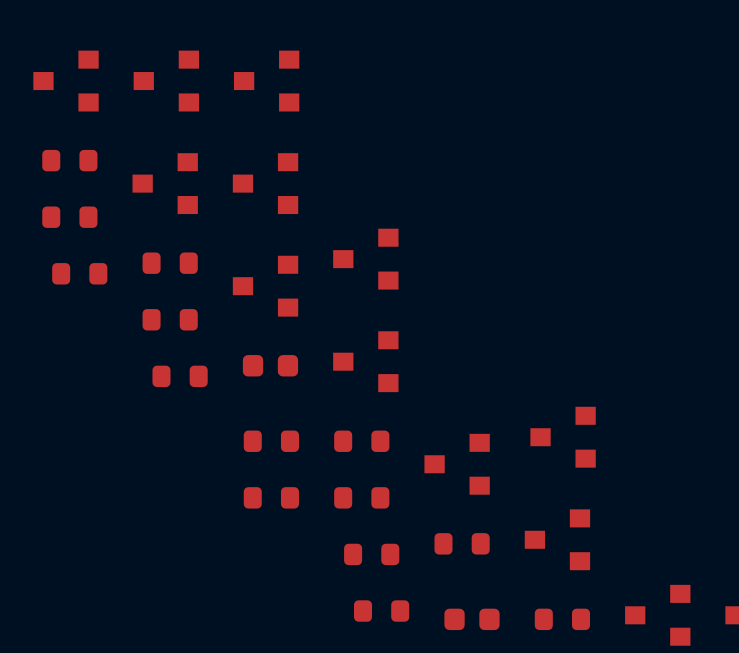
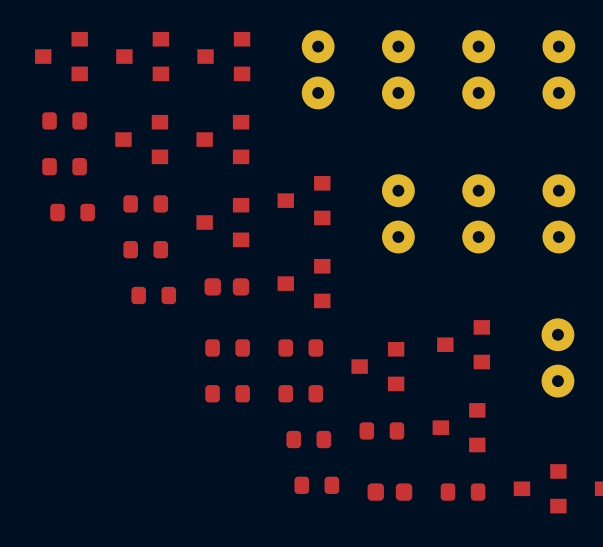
part: none -> (318, 69)
part: none -> (398, 69)
part: none -> (478, 69)
part: none -> (558, 69)
part: none -> (398, 213)
part: none -> (478, 213)
part: none -> (558, 213)
part: none -> (557, 357)

